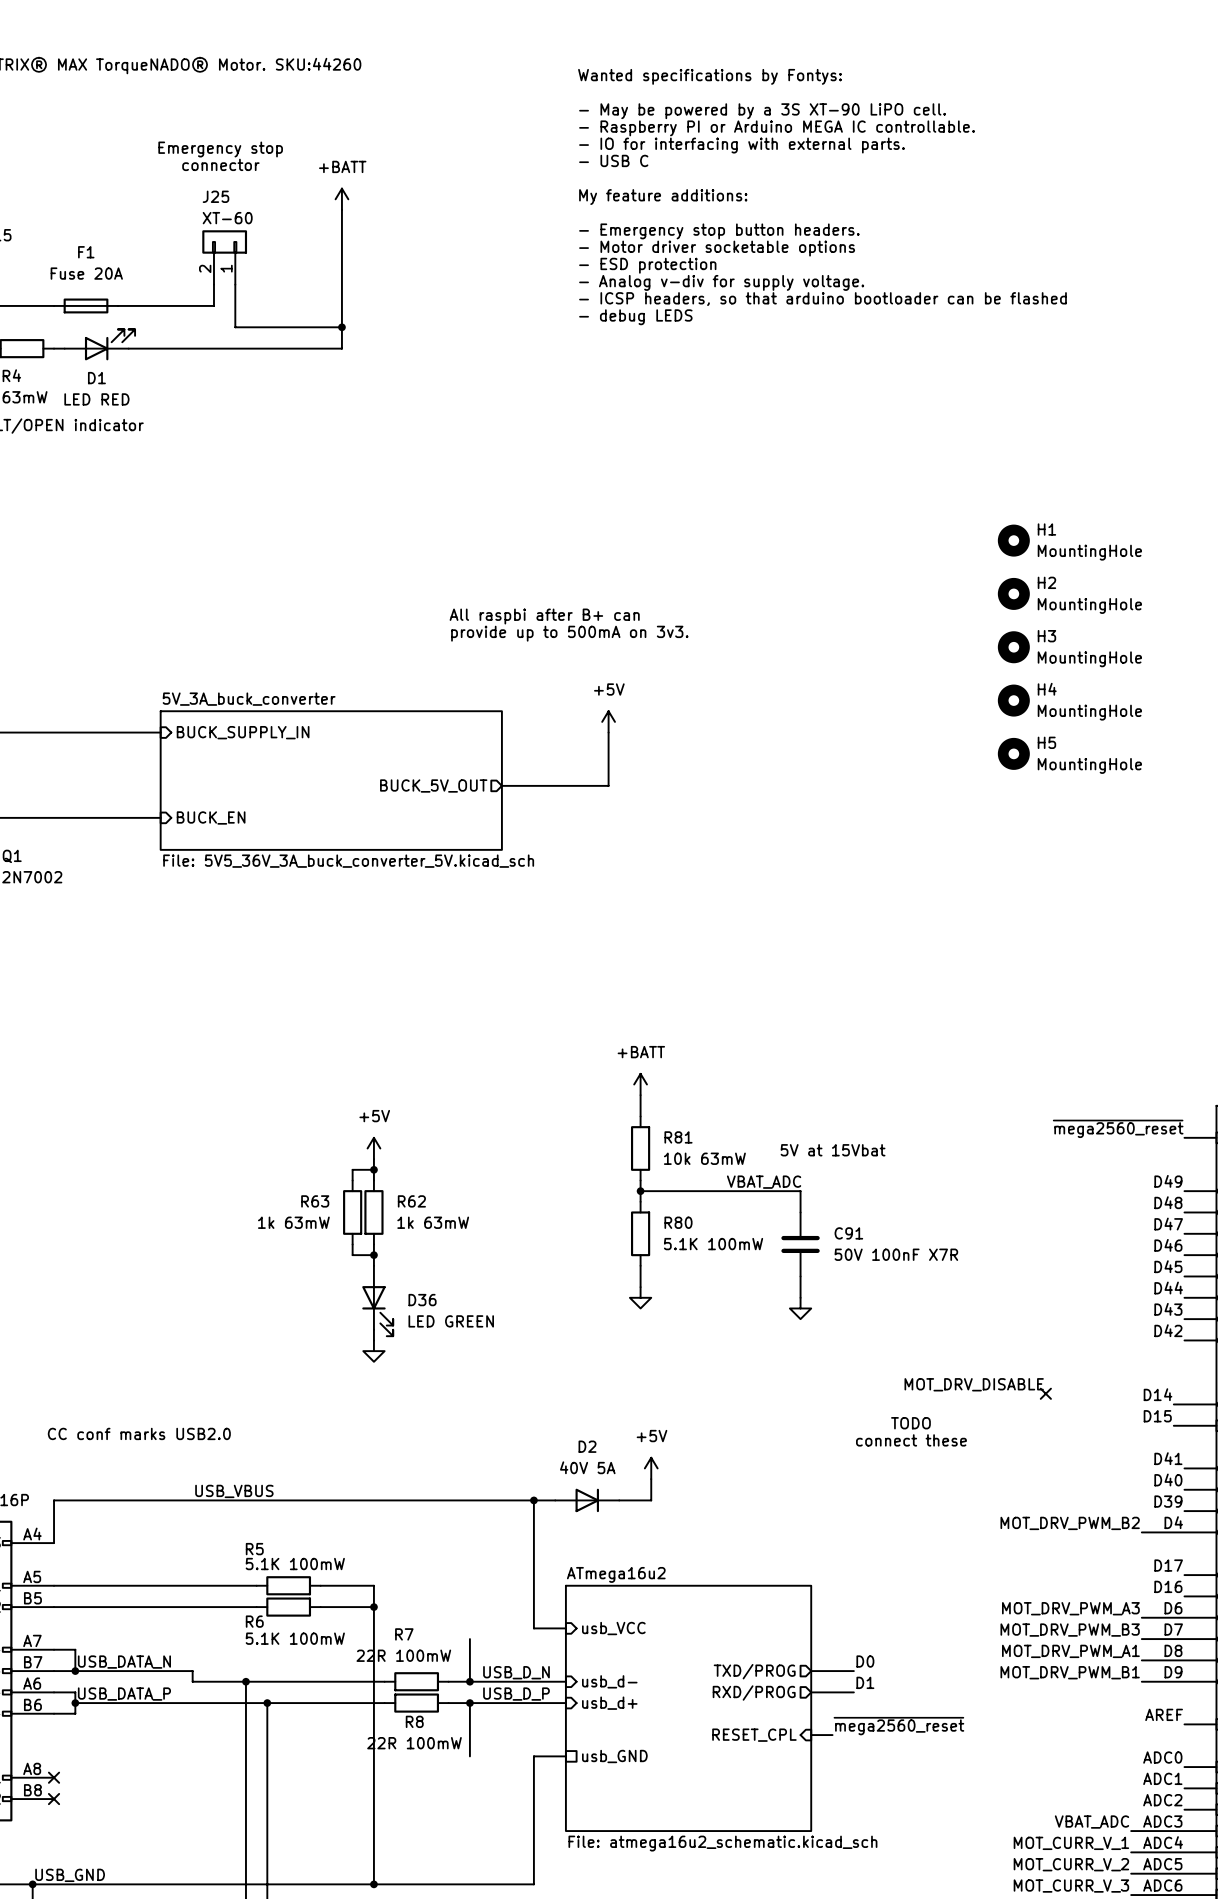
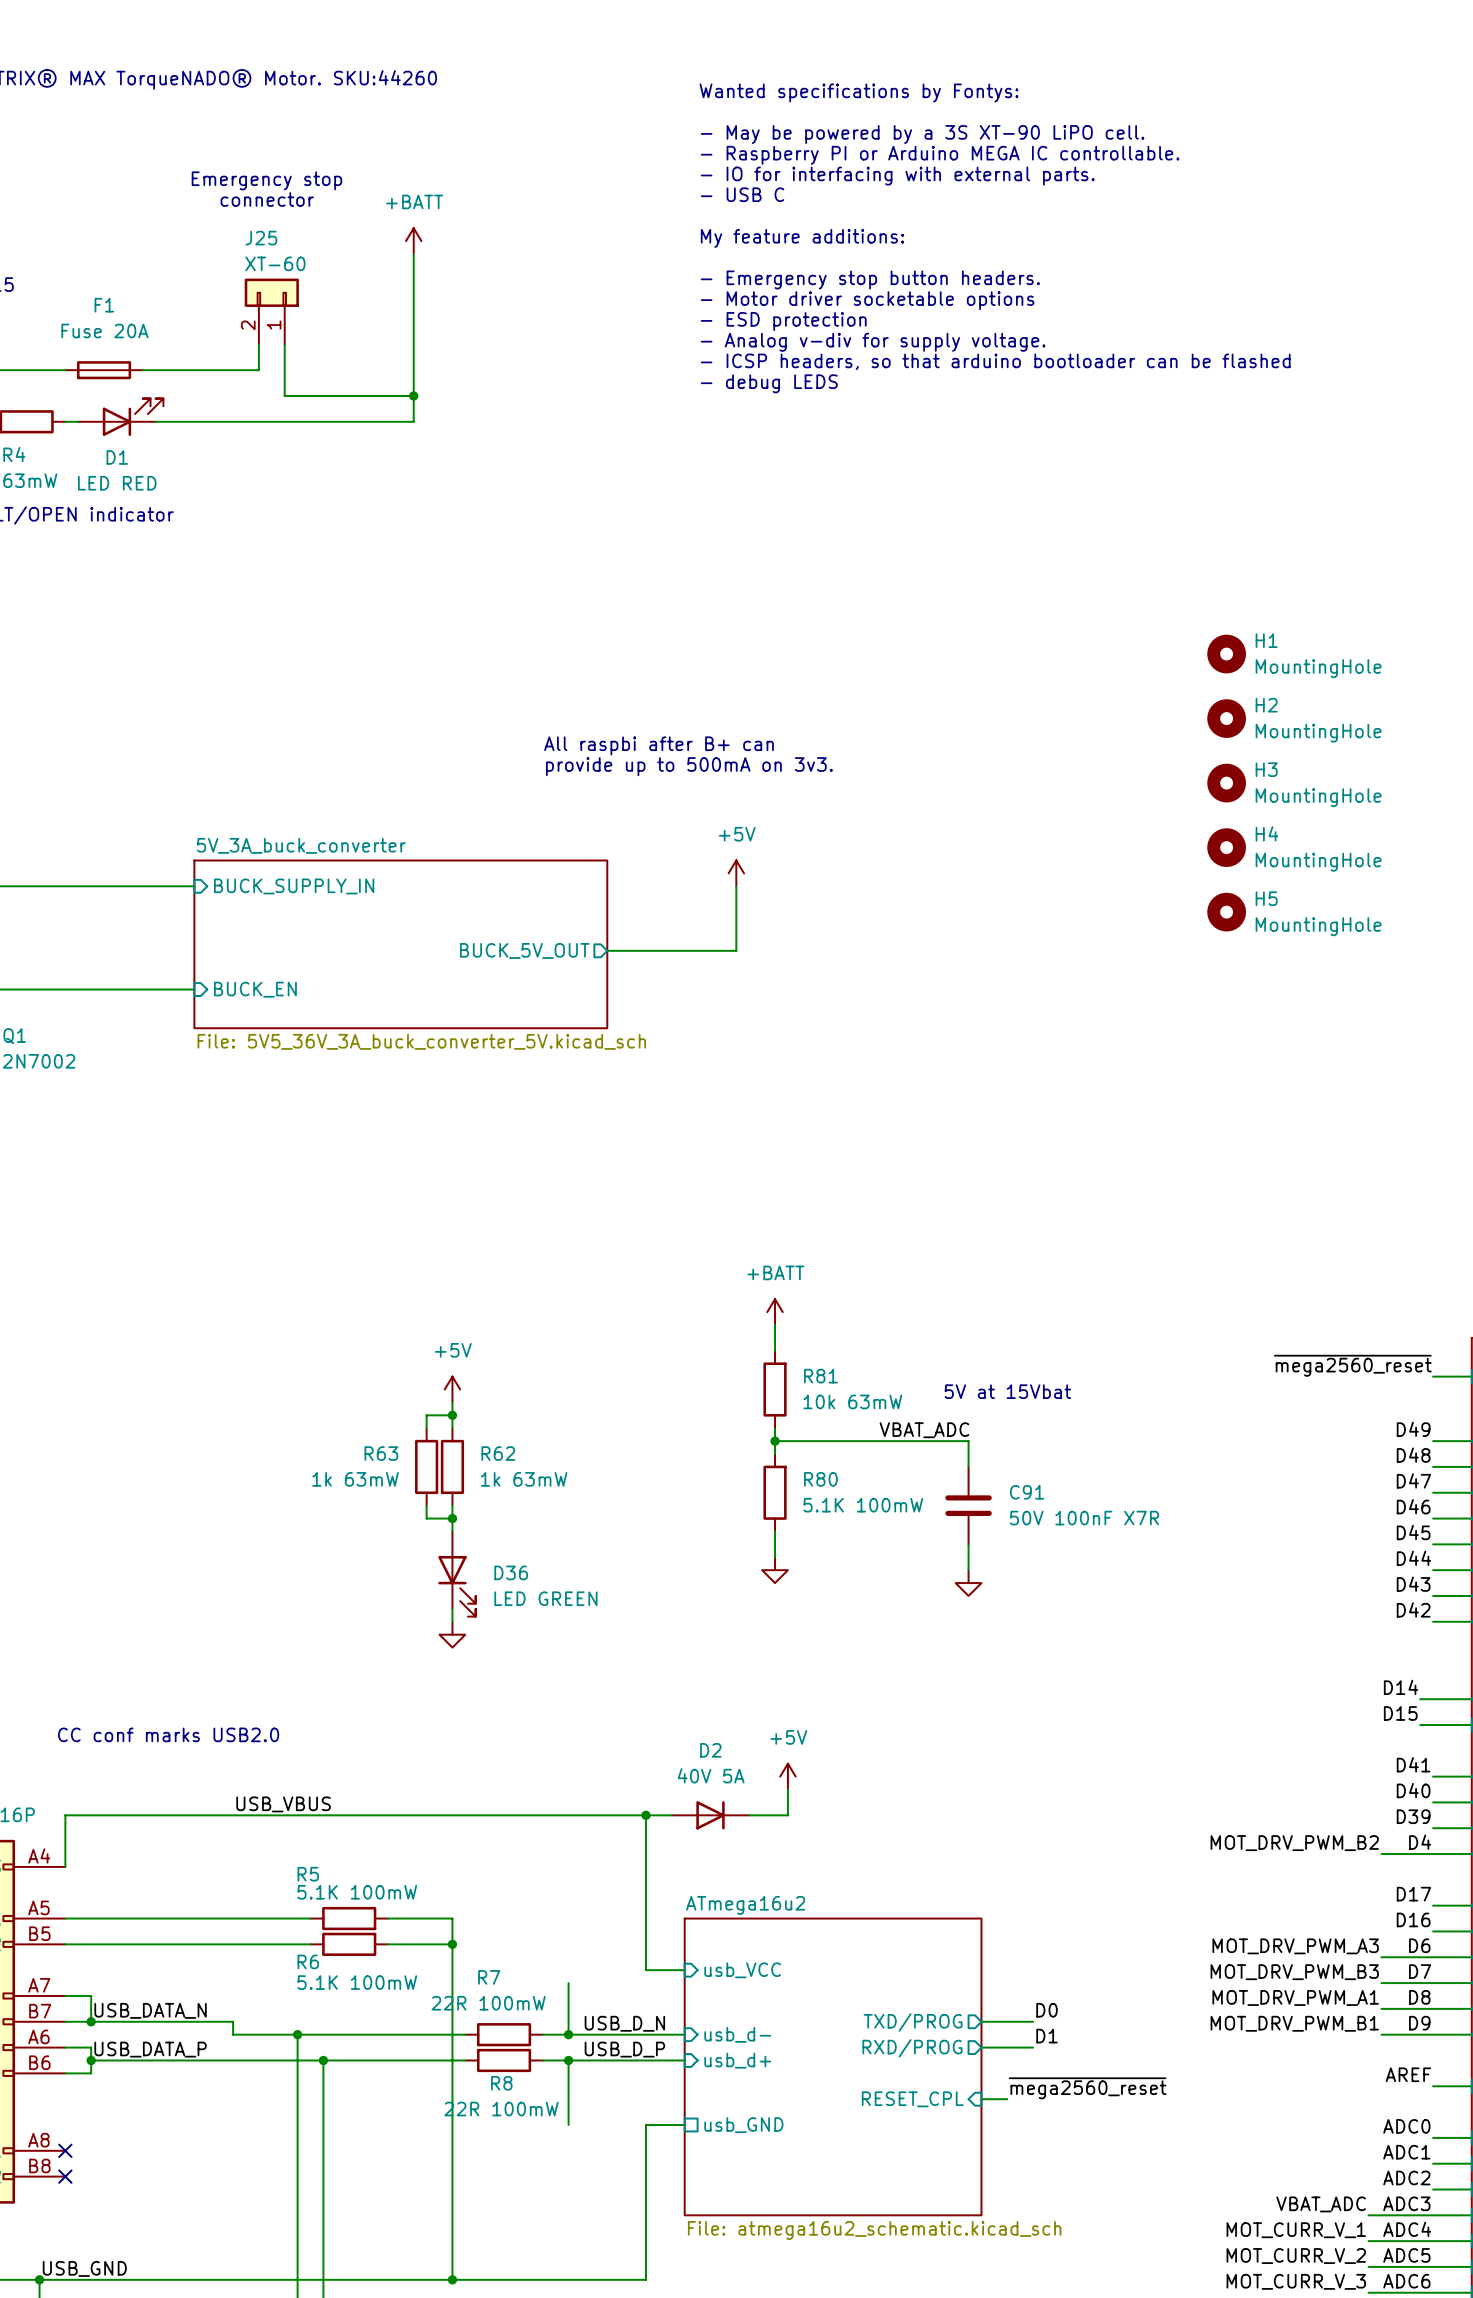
label: MOT_DRV_DISABLE (974, 1384) -> none
no-connect mark: (1045, 1393) -> none
text: TODO (910, 1423) -> none
text: connect these (911, 1440) -> none

